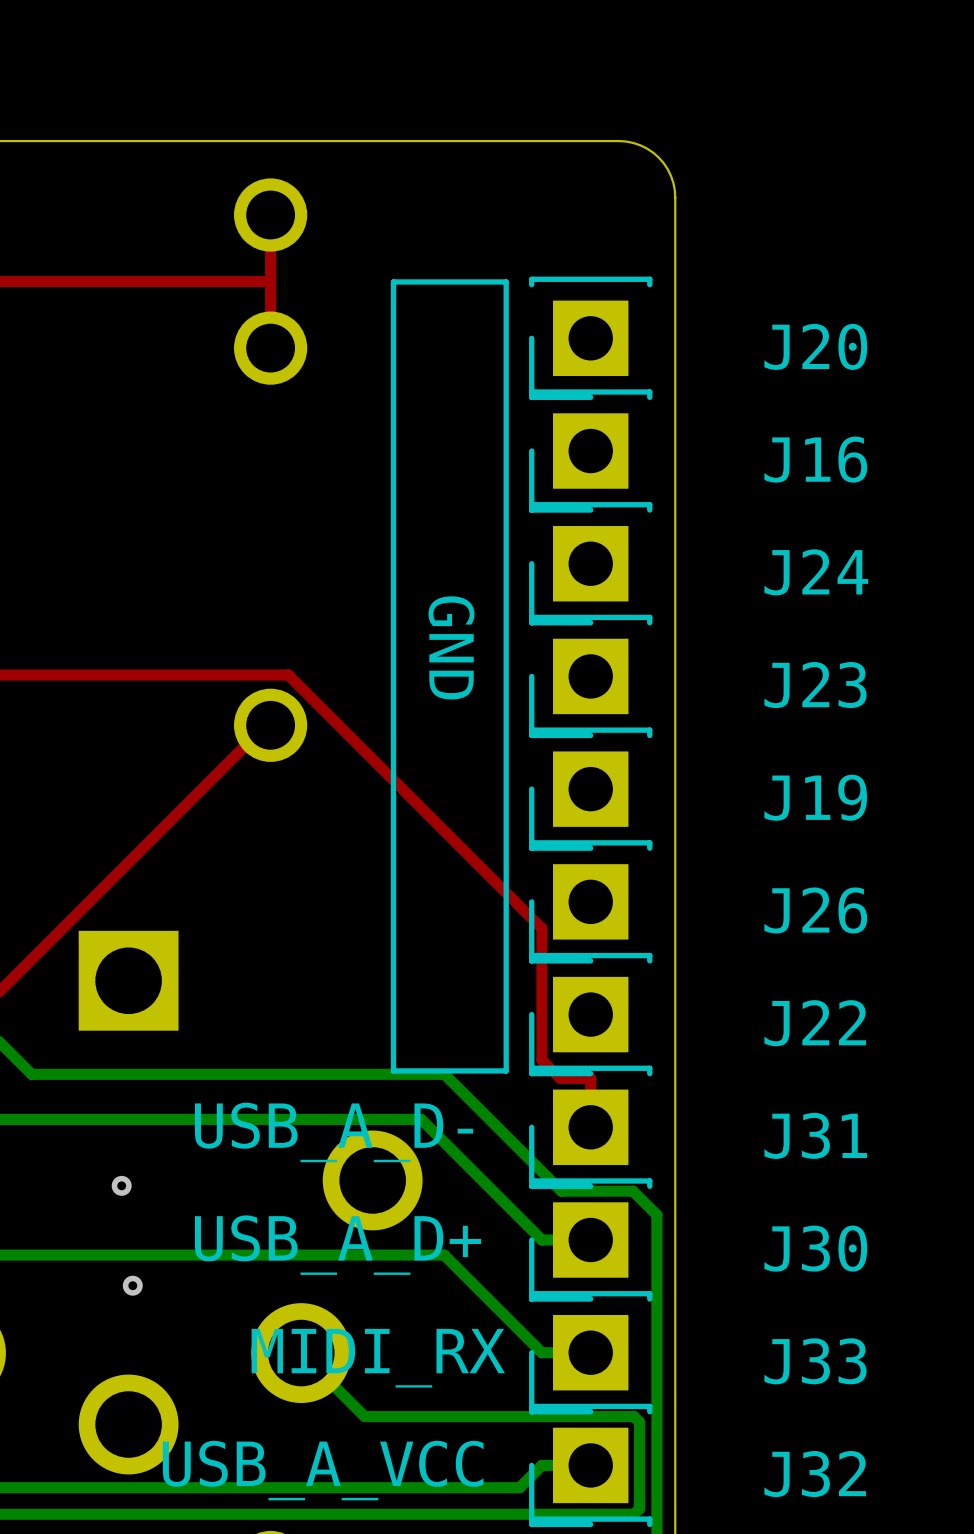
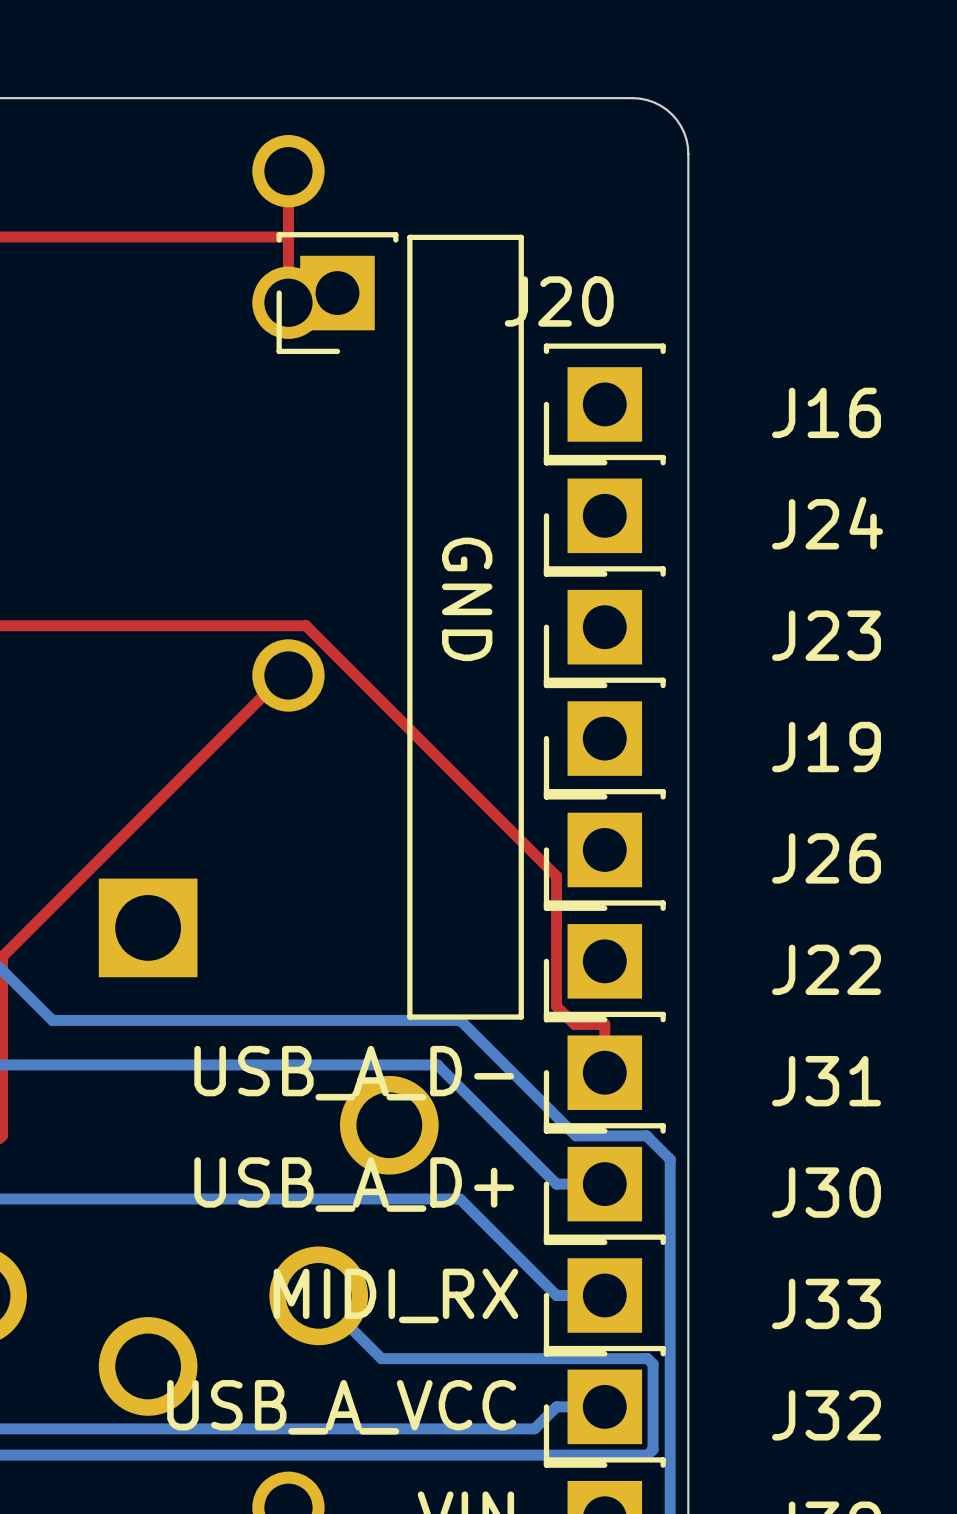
J20 position: (590, 338) -> (337, 293)
via: (121, 1185) -> none
via: (132, 1285) -> none

